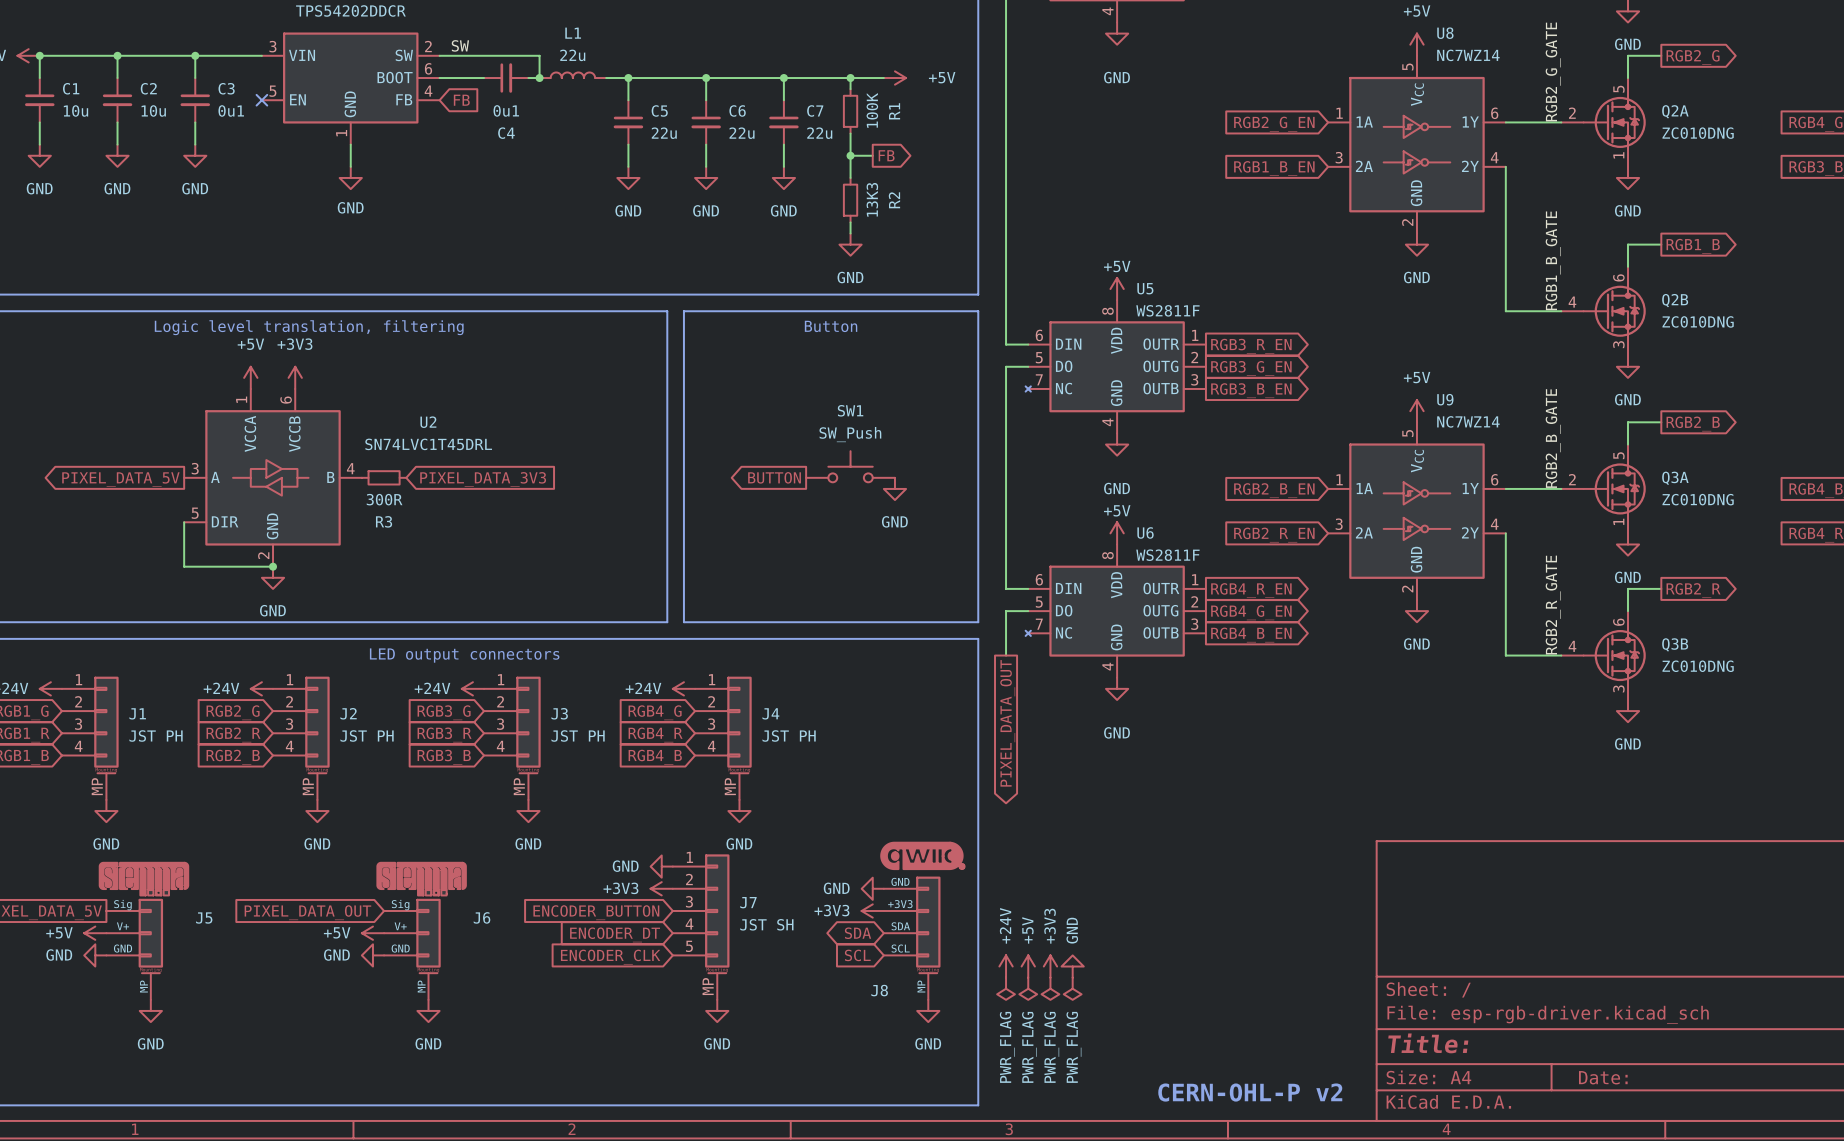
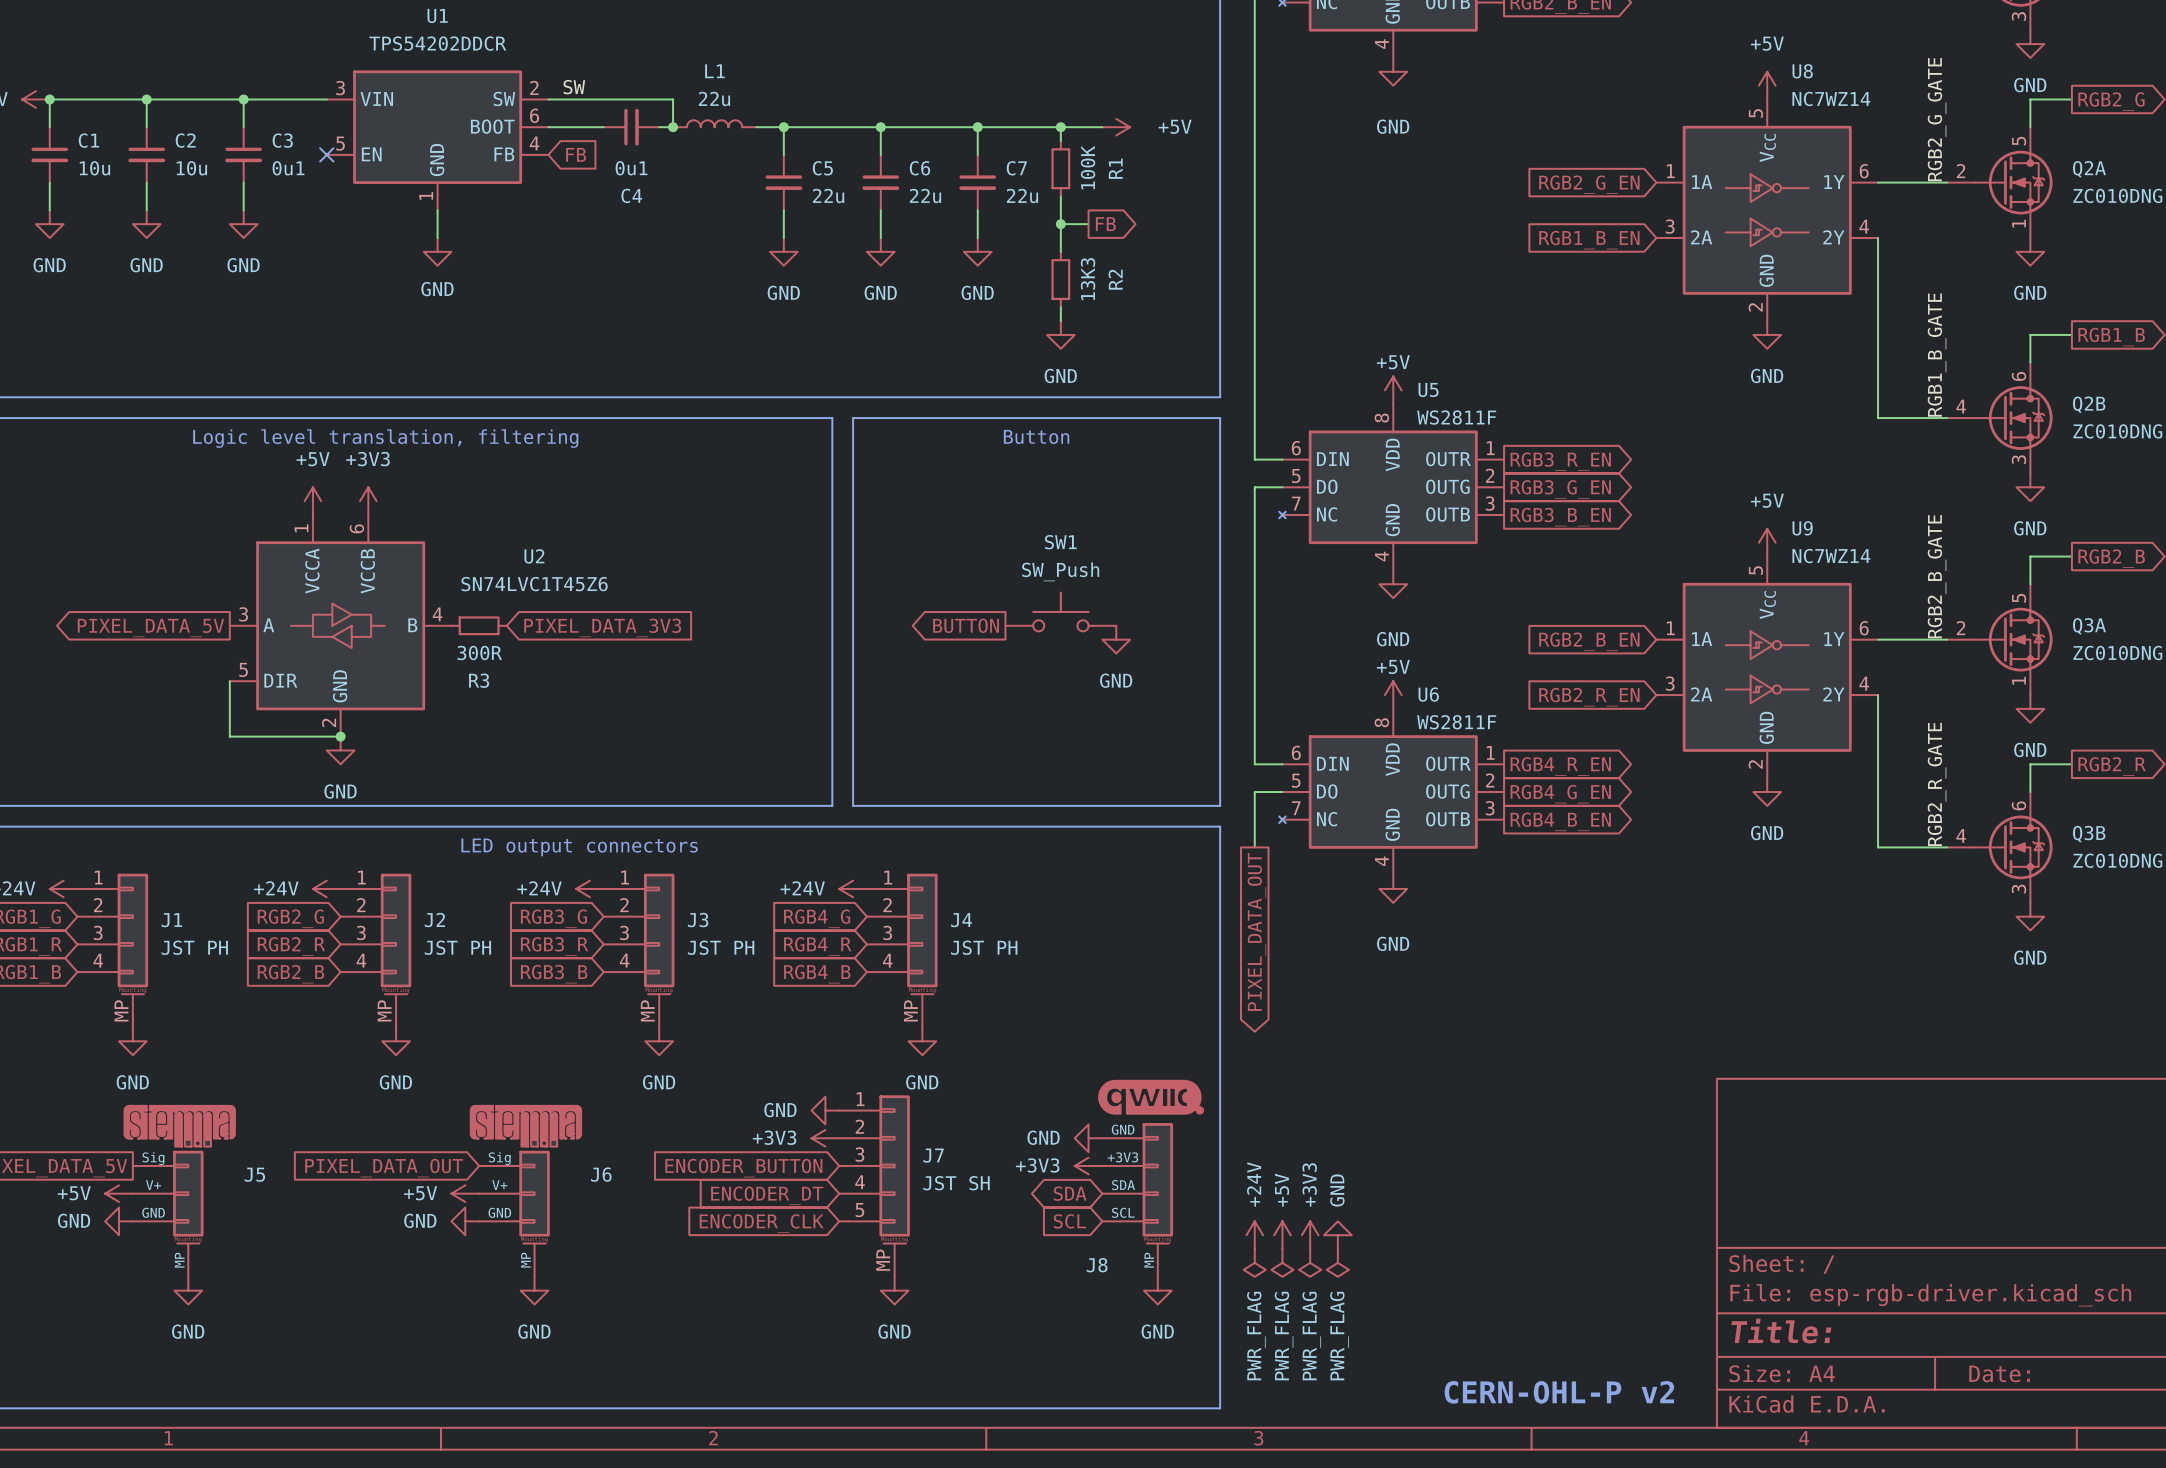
U2 value: SN74LVC1T45DRL (428, 444) -> SN74LVC1T45Z6 (534, 584)

